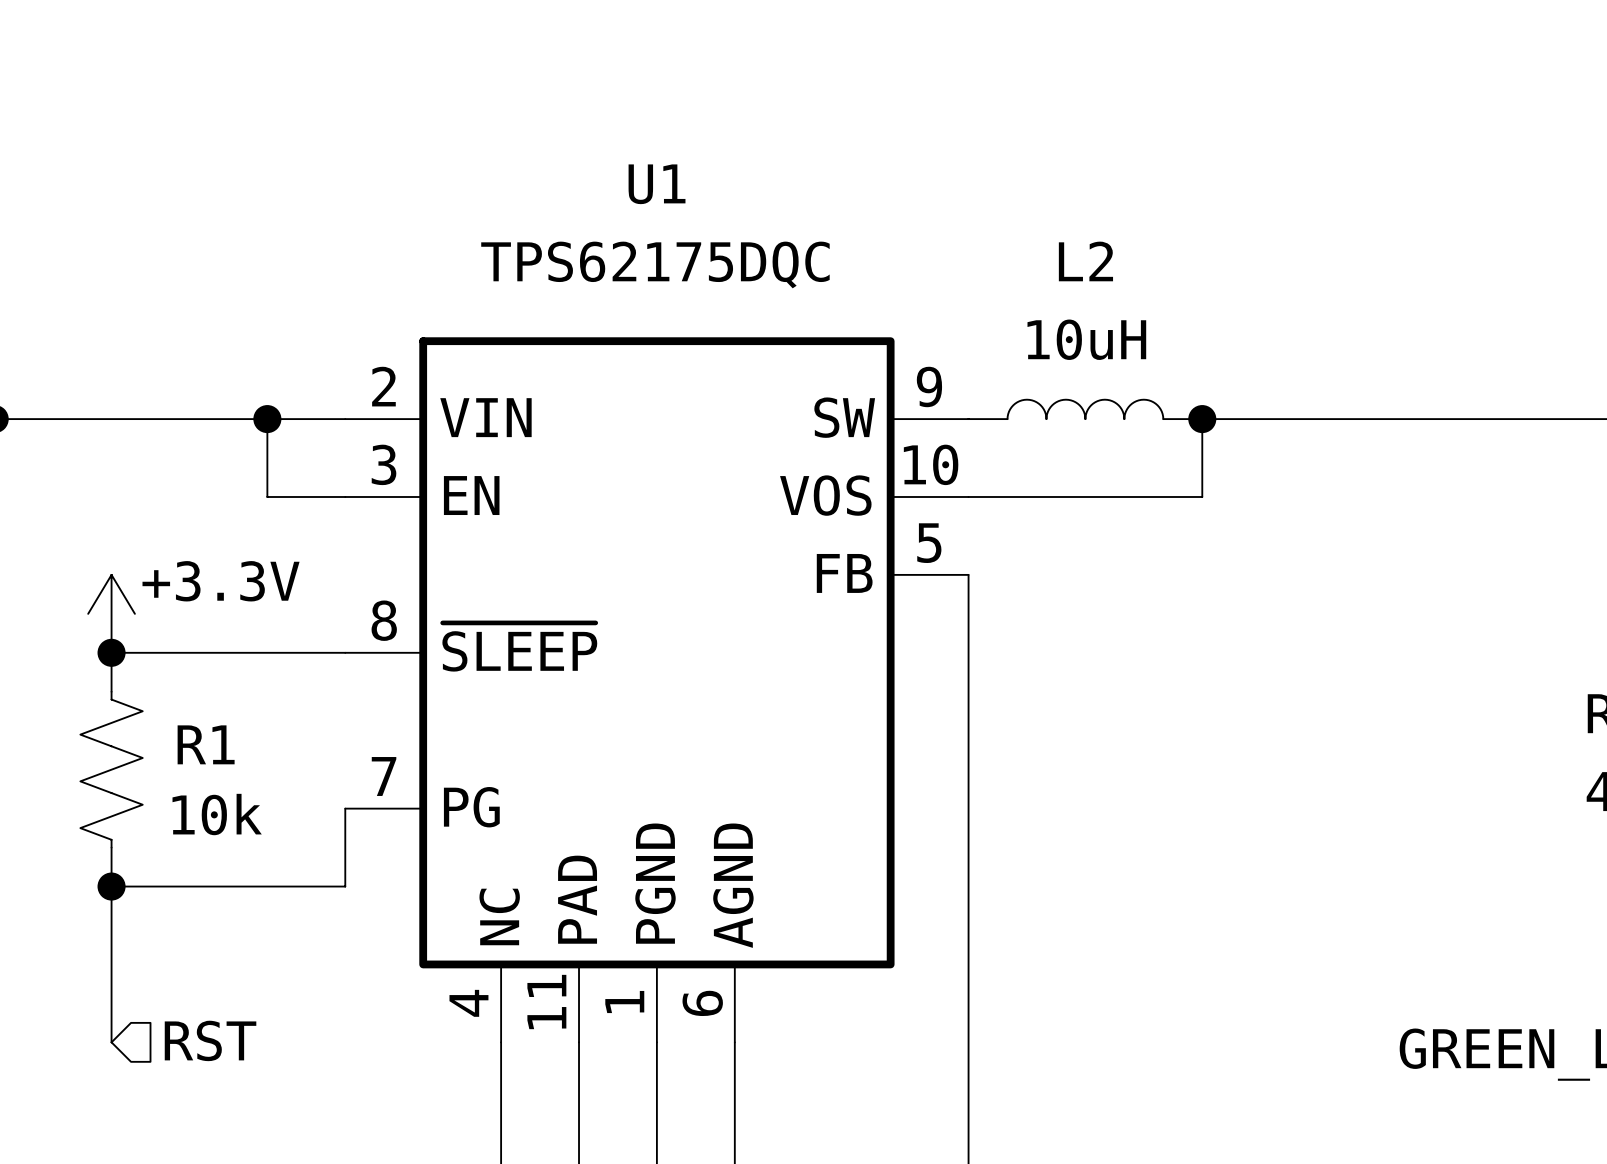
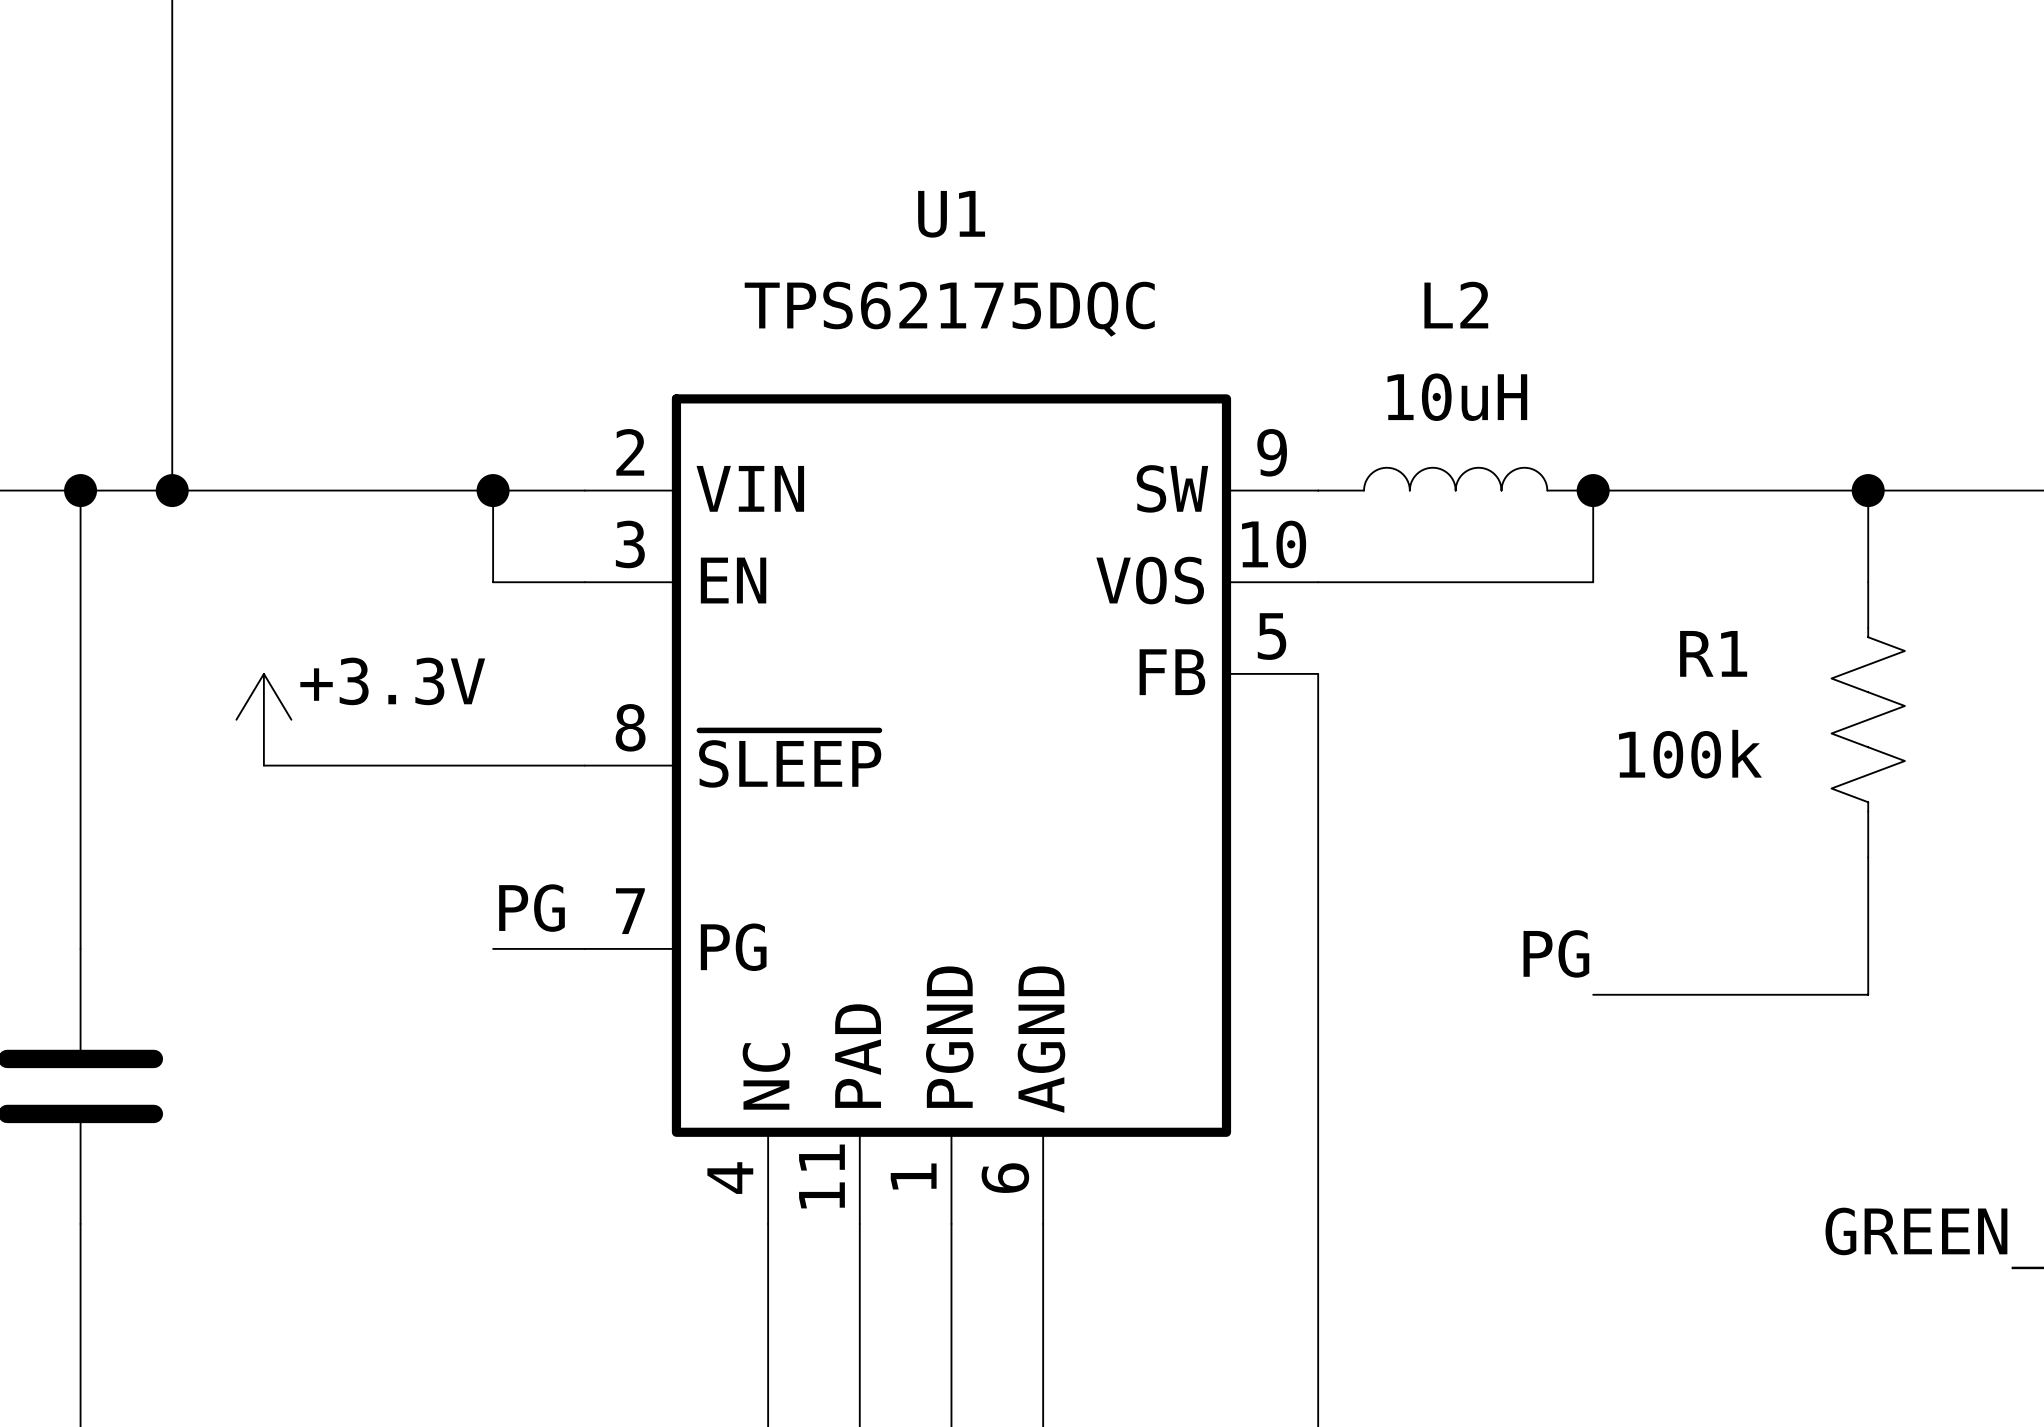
wire: none -> (1868, 490) (1868, 582)
junction: none -> (1868, 490)
power symbol position: +3.3V (111, 613) -> +3.3V (263, 719)
wire: none -> (263, 765) (309, 765)
junction: (111, 652) -> none
wire: none -> (1868, 857) (1868, 994) (1593, 994)
R1 name position: R1 (206, 744) -> R1 (1713, 653)
R1 position: (111, 769) -> (1868, 719)
label: none -> PG (532, 908)
wire: (345, 808) (345, 886) (111, 886) (111, 1042) -> (584, 948) (493, 948)
label: none -> PG (1556, 953)
R1 value: 10k (217, 814) -> 100k (1690, 754)
junction: (111, 886) -> none
hierarchical label: RST (210, 1040) -> none

